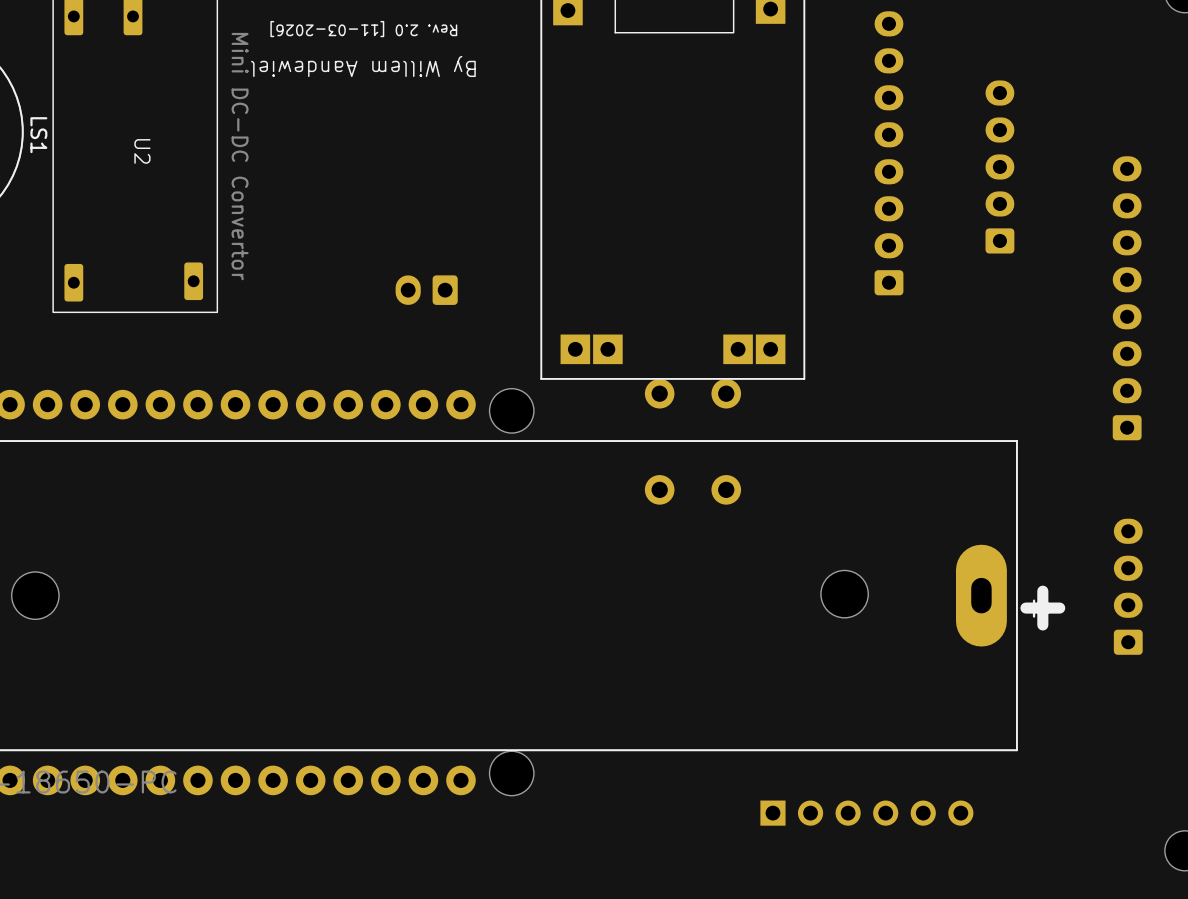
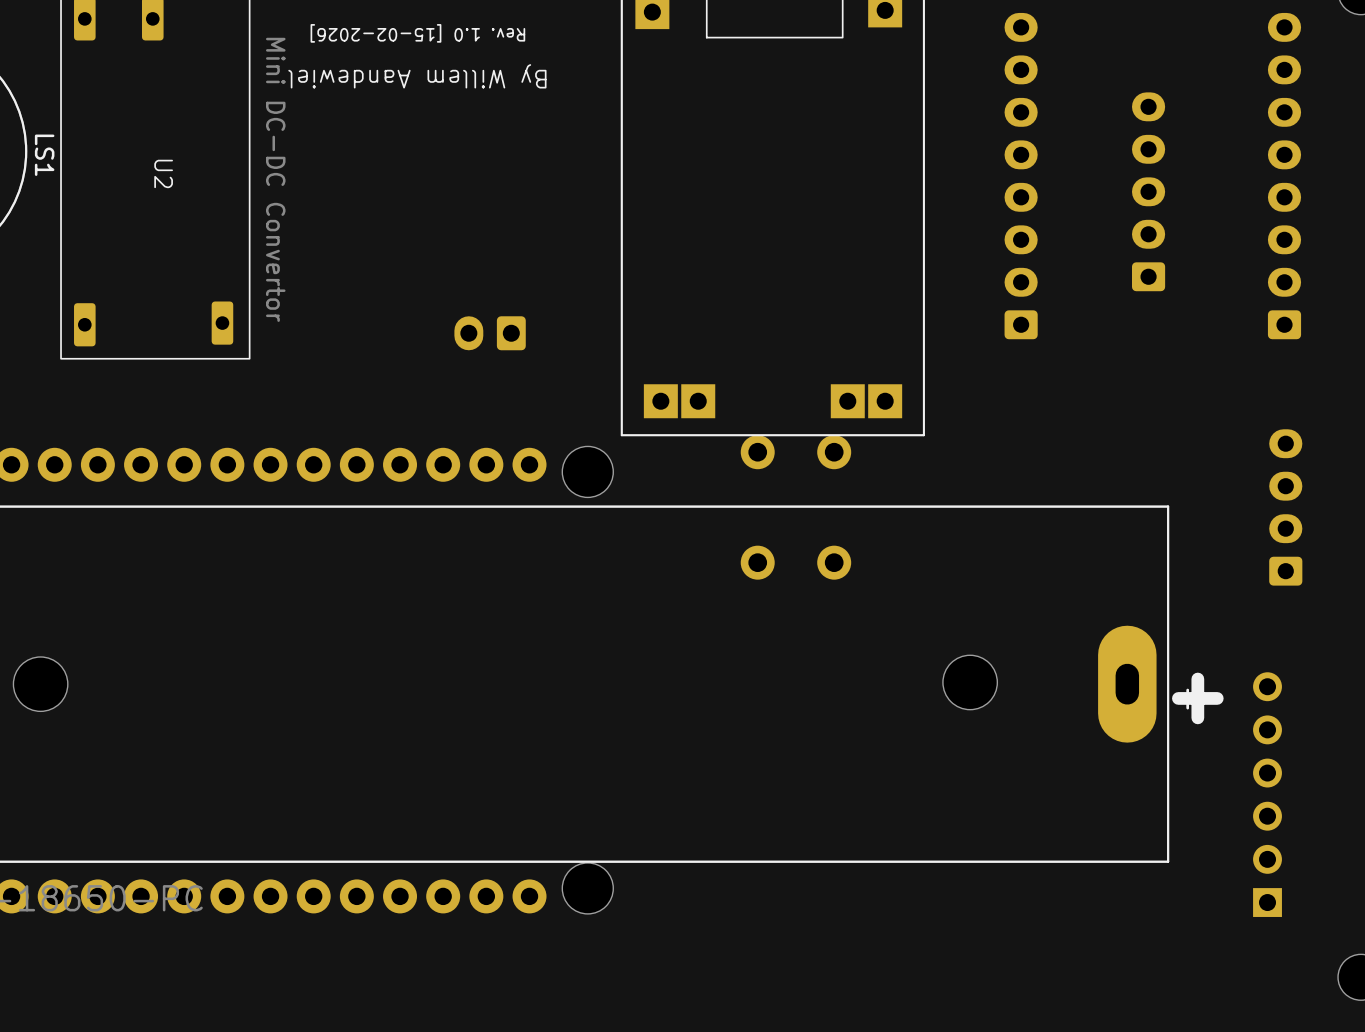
text: Rev. 2.0 [11-03-2026] (363, 29) -> Rev. 1.0 [15-02-2026] (417, 33)
part position: (1127, 298) -> (1284, 176)
part position: (1128, 586) -> (1285, 507)
part rotation: 0° (866, 813) -> 90° counterclockwise (1267, 794)
part position: (866, 813) -> (1267, 794)

